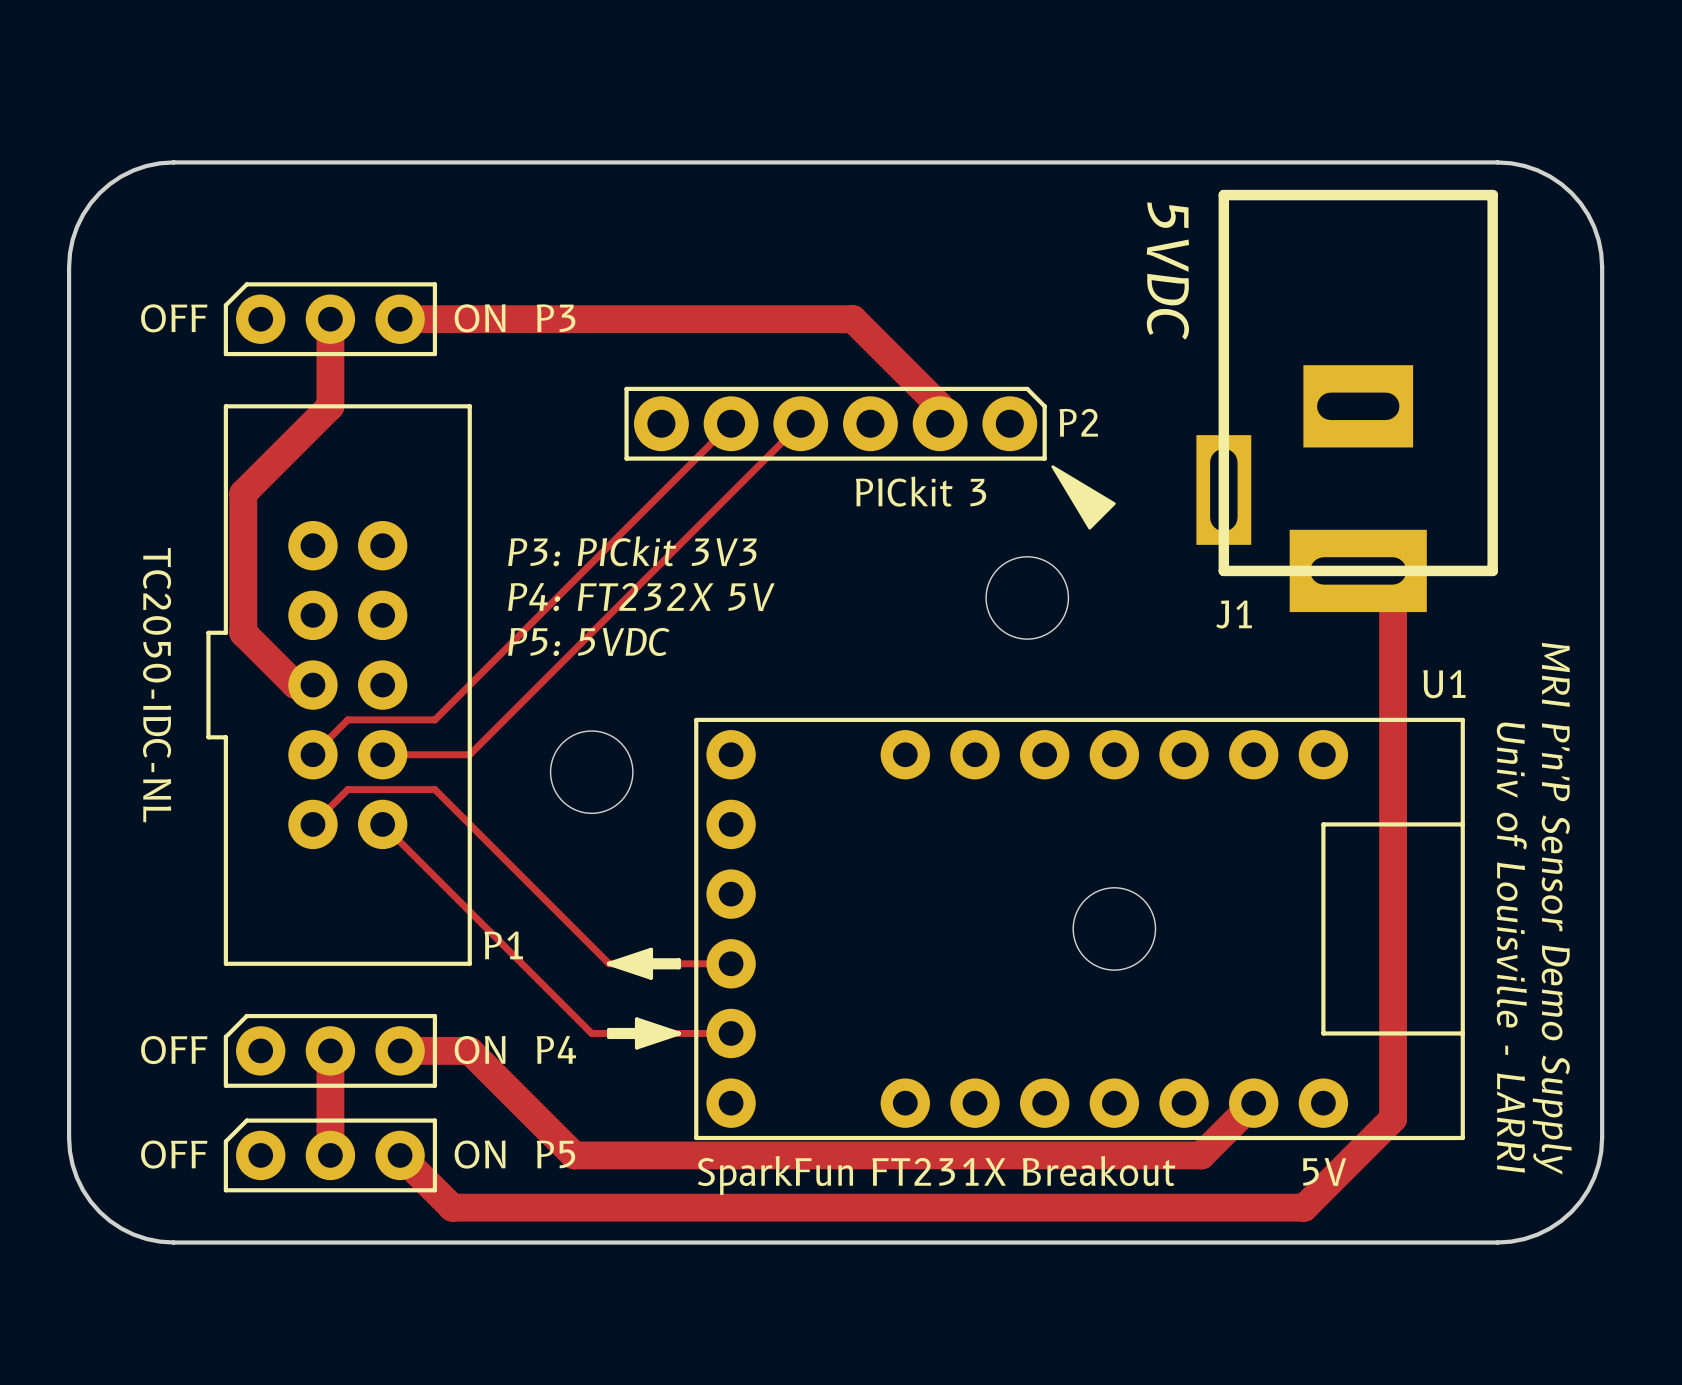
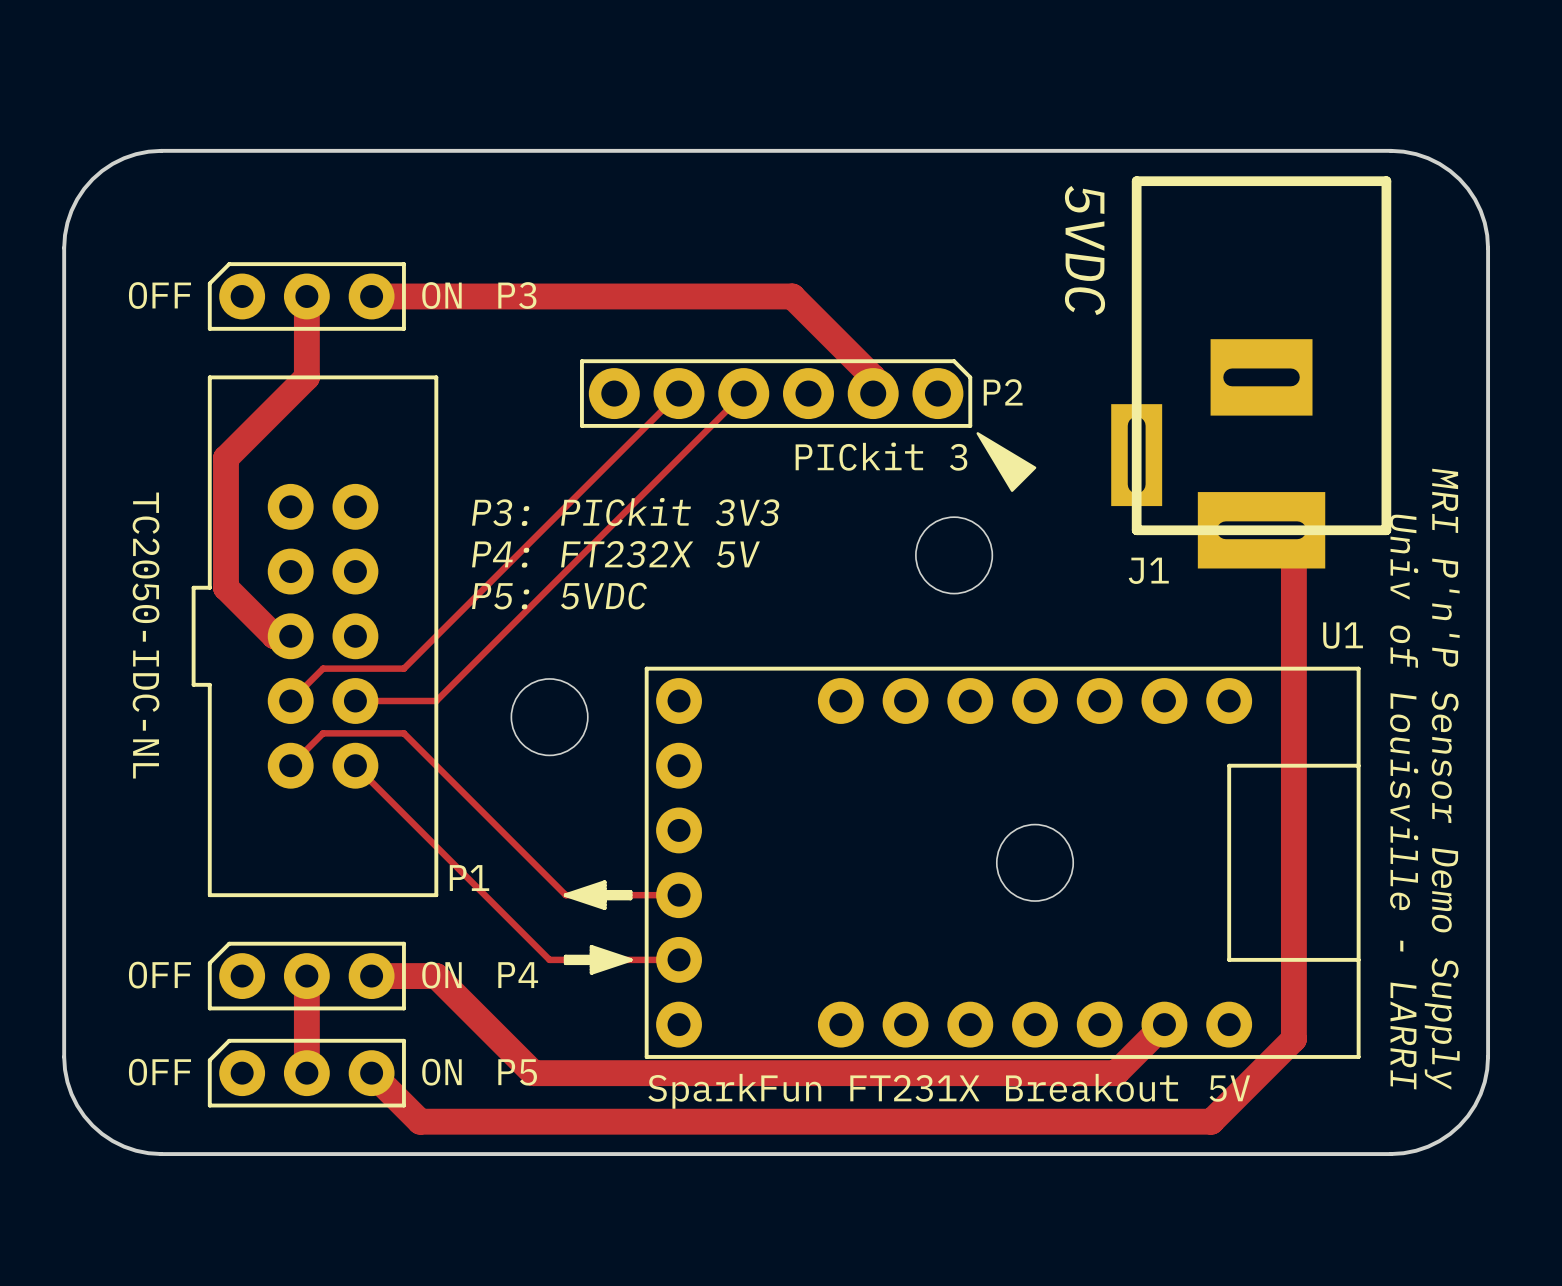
J1 footprint: [1196, 189, 1498, 613] -> [1111, 176, 1392, 569]

